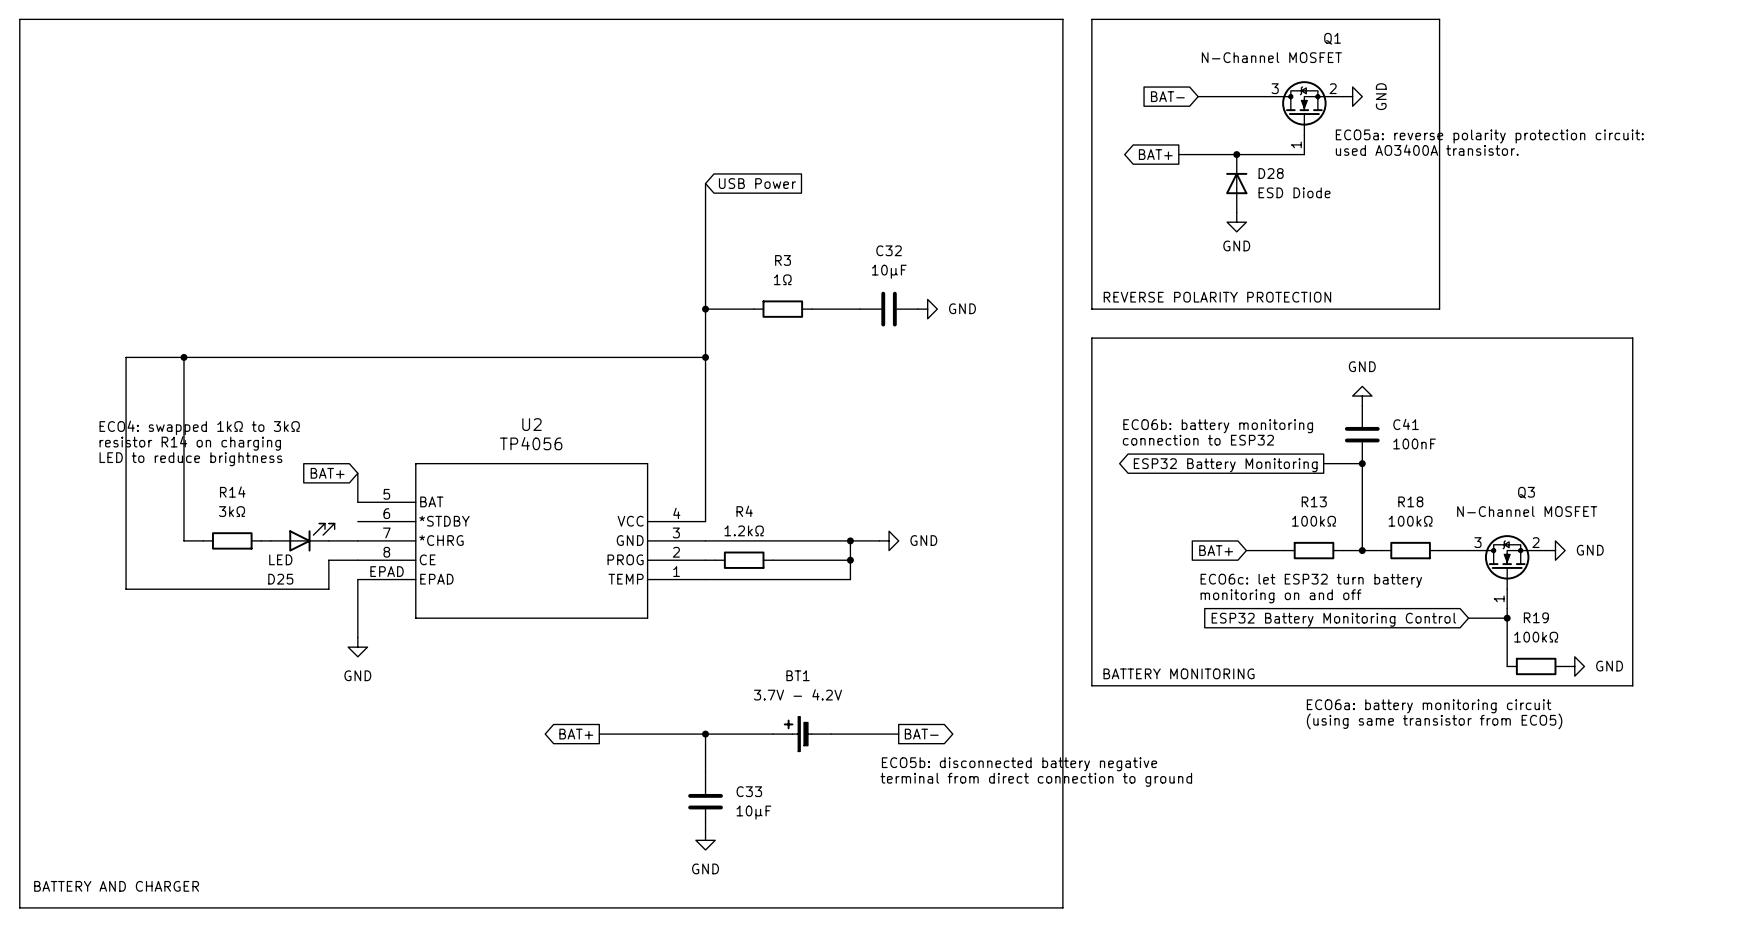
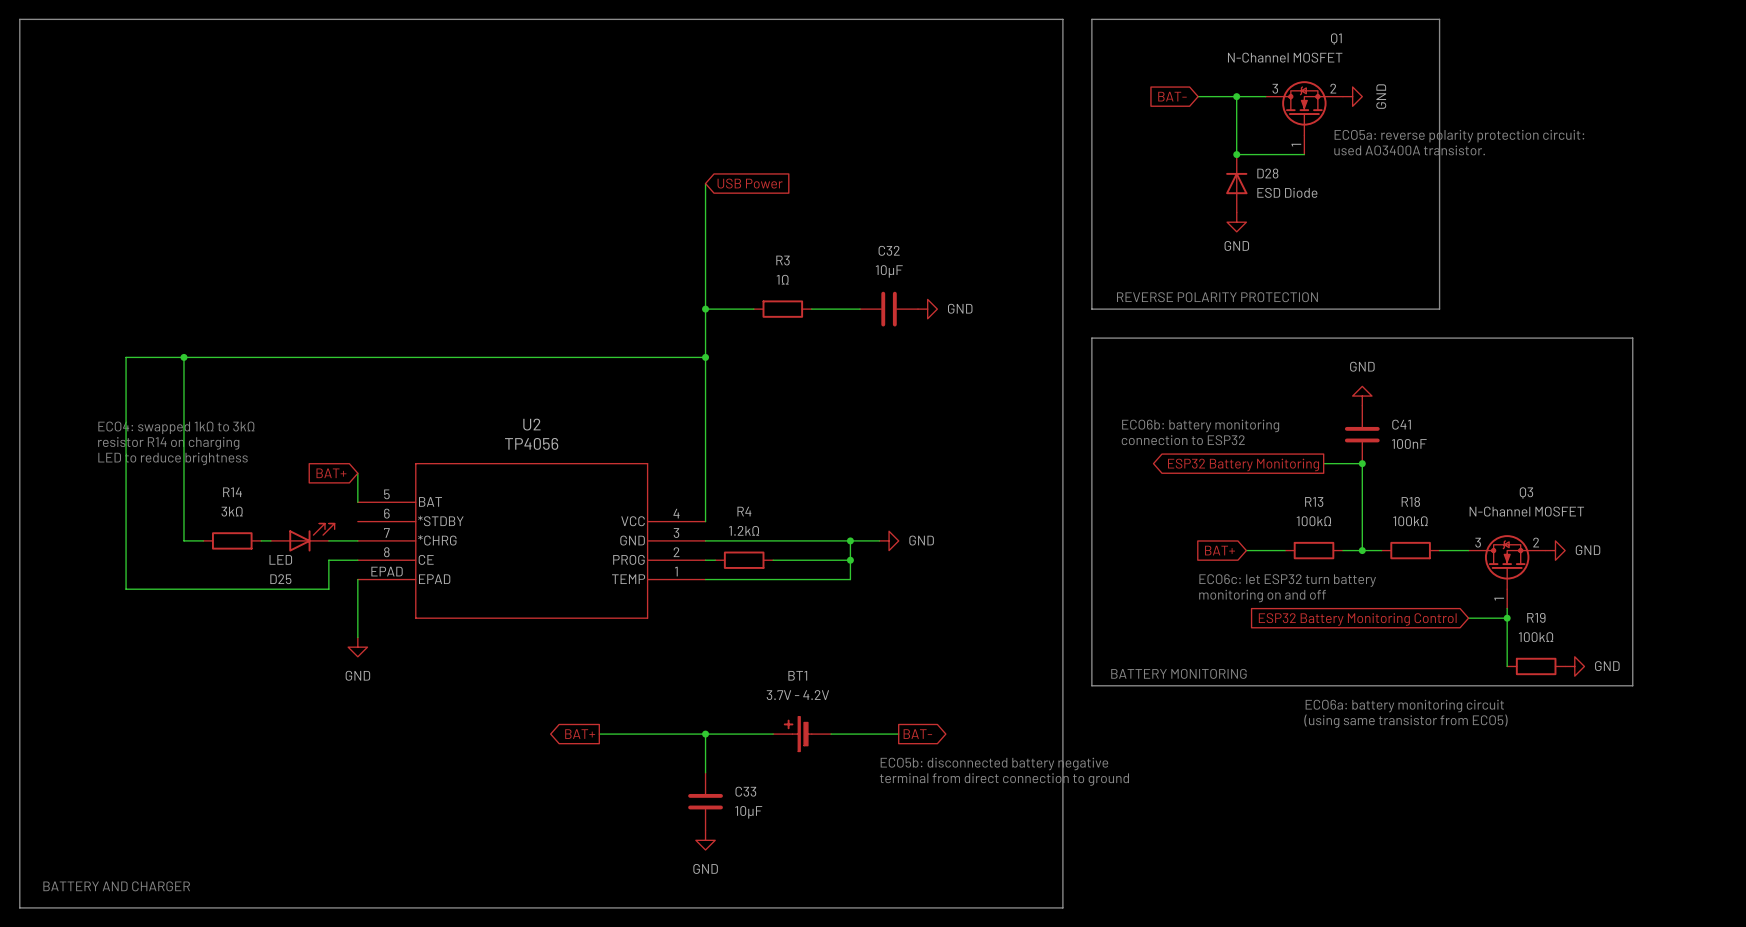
junction: none -> (1236, 96)
global label: BAT+ (1155, 154) -> none
wire: (1178, 154) (1236, 154) -> (1236, 96) (1236, 154)

